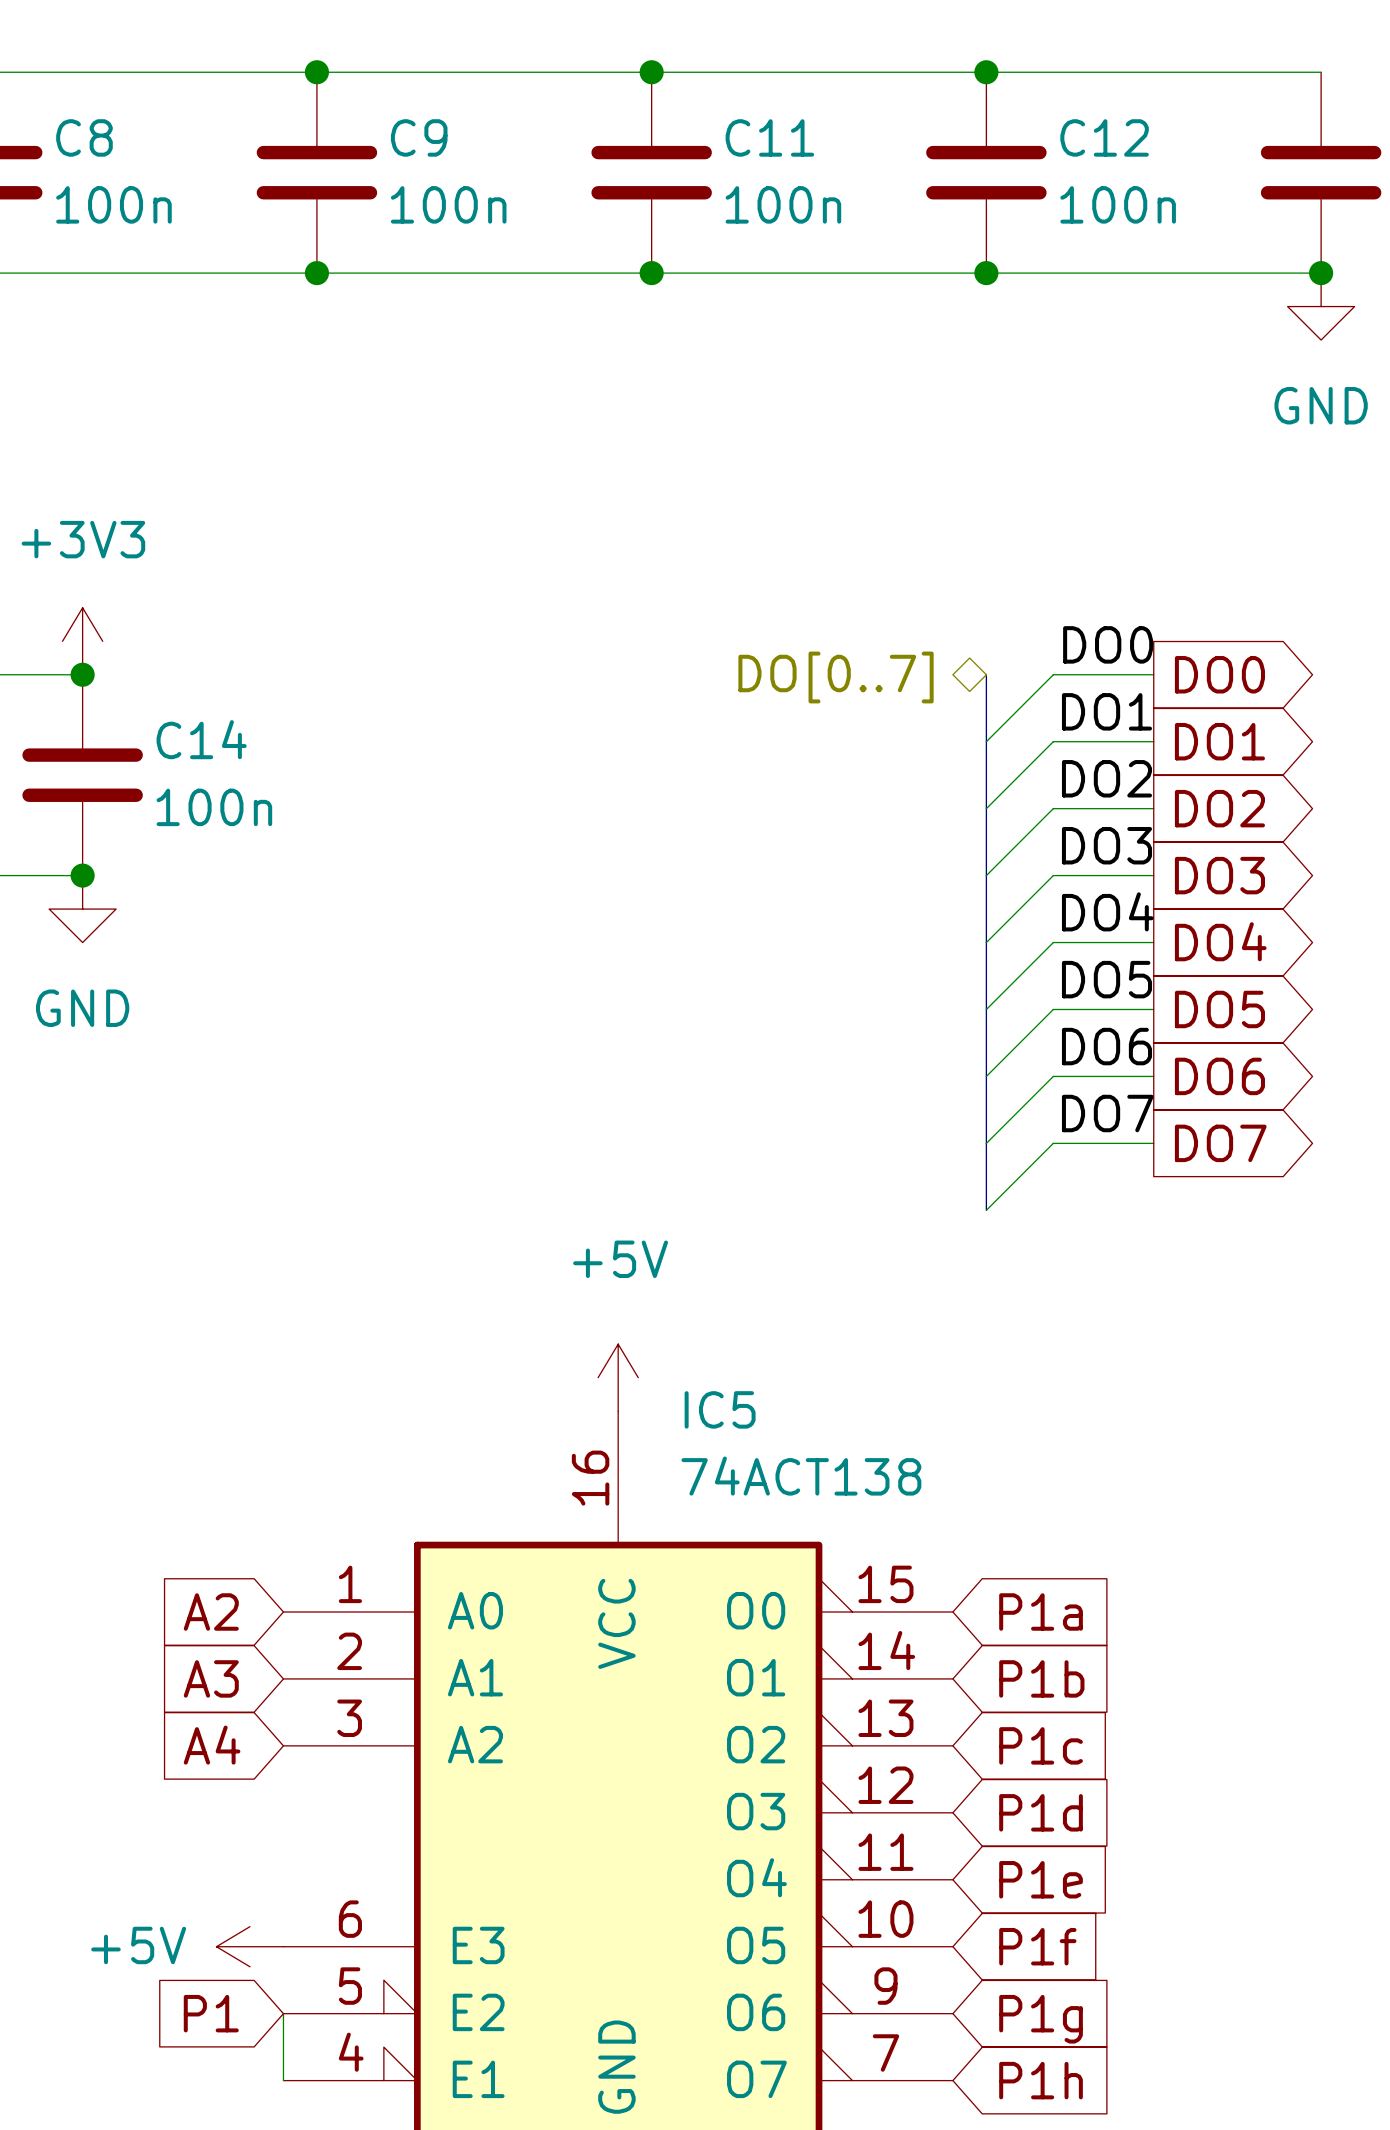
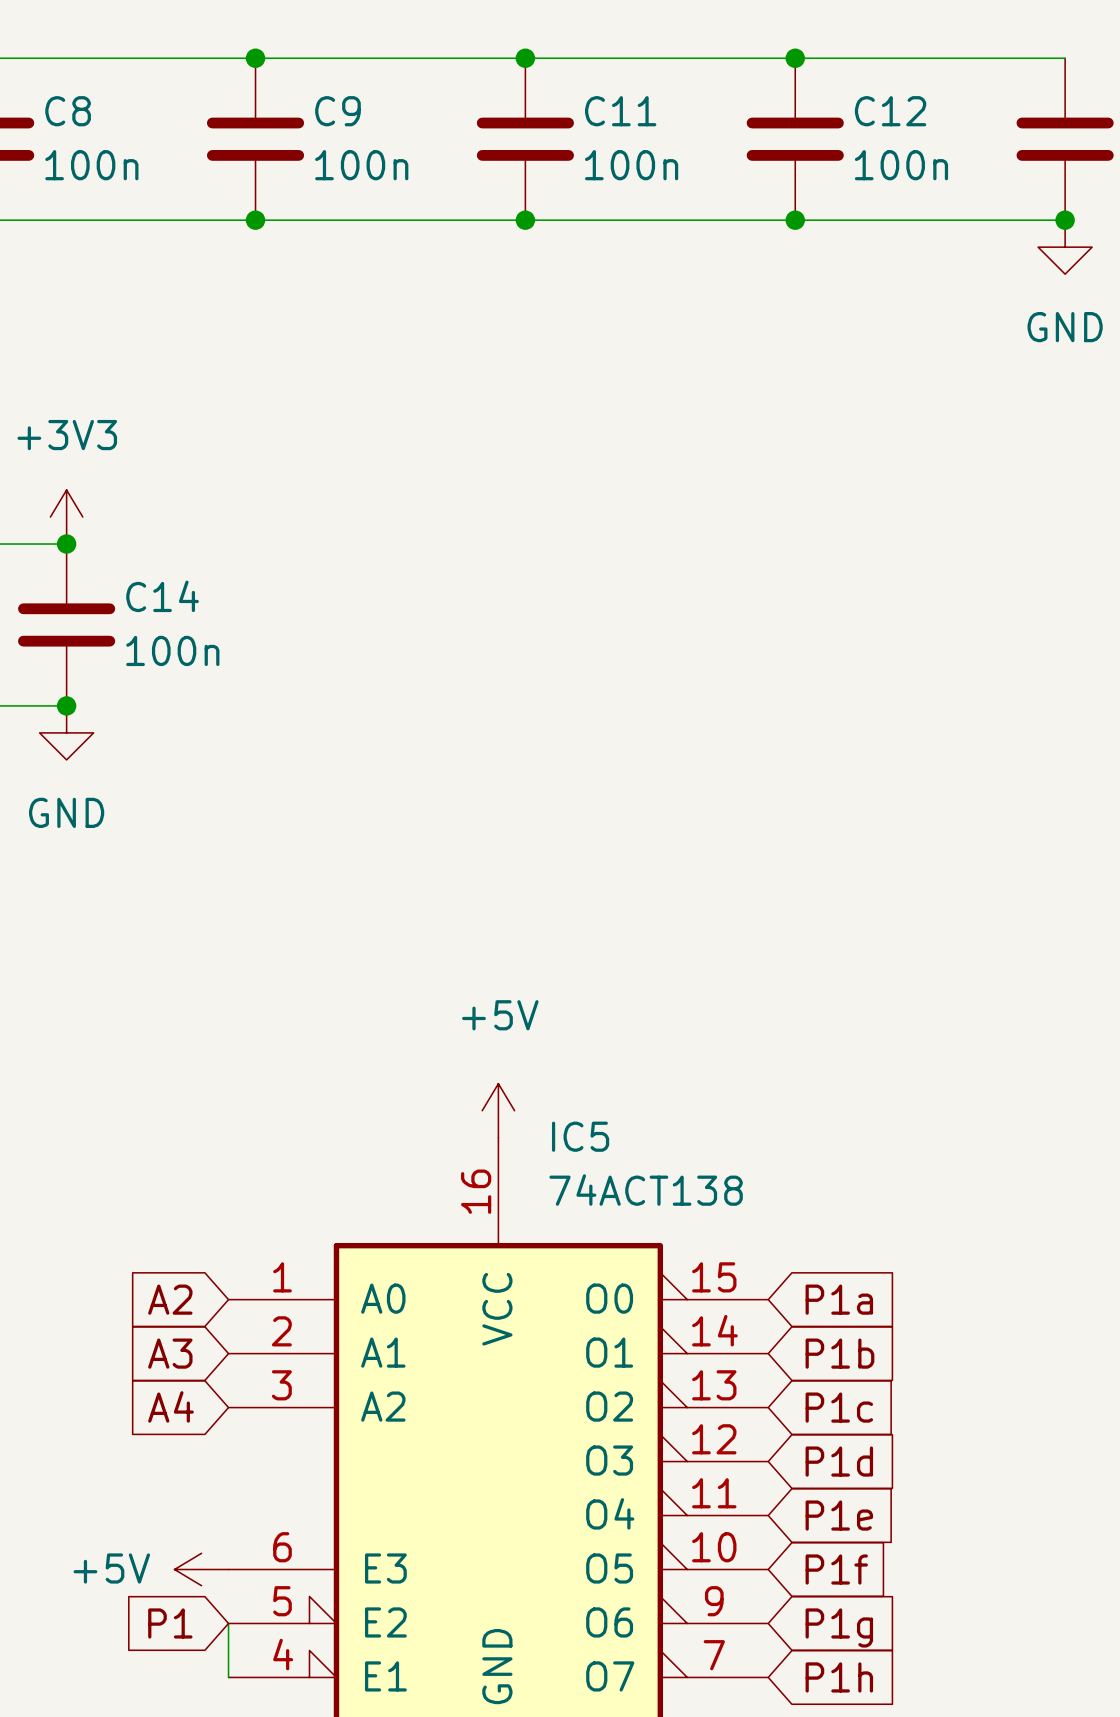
label: DO0 (1108, 644) -> none
bus: (986, 674) (986, 1210) -> none
wire: (1153, 674) (1053, 674) (986, 741) -> none
global label: DO0 (1219, 674) -> none
hierarchical label: DO[0..7] (836, 677) -> none
label: DO1 (1106, 711) -> none
wire: (1153, 741) (1053, 741) (986, 808) -> none
global label: DO1 (1219, 741) -> none
label: DO2 (1106, 778) -> none
wire: (1153, 808) (1053, 808) (986, 875) -> none
global label: DO2 (1219, 808) -> none
label: DO3 (1106, 845) -> none
wire: (1153, 875) (1053, 875) (986, 942) -> none
global label: DO3 (1219, 875) -> none
label: DO4 (1107, 911) -> none
global label: DO4 (1220, 941) -> none
wire: (1153, 942) (1053, 942) (986, 1009) -> none
label: DO5 (1106, 979) -> none
wire: (1153, 1009) (1053, 1009) (986, 1076) -> none
global label: DO5 (1219, 1009) -> none
label: DO6 (1106, 1046) -> none
wire: (1153, 1076) (1053, 1076) (986, 1143) -> none
global label: DO6 (1219, 1076) -> none
label: DO7 (1107, 1113) -> none
wire: (1153, 1143) (1053, 1143) (986, 1210) -> none
global label: DO7 (1220, 1143) -> none

